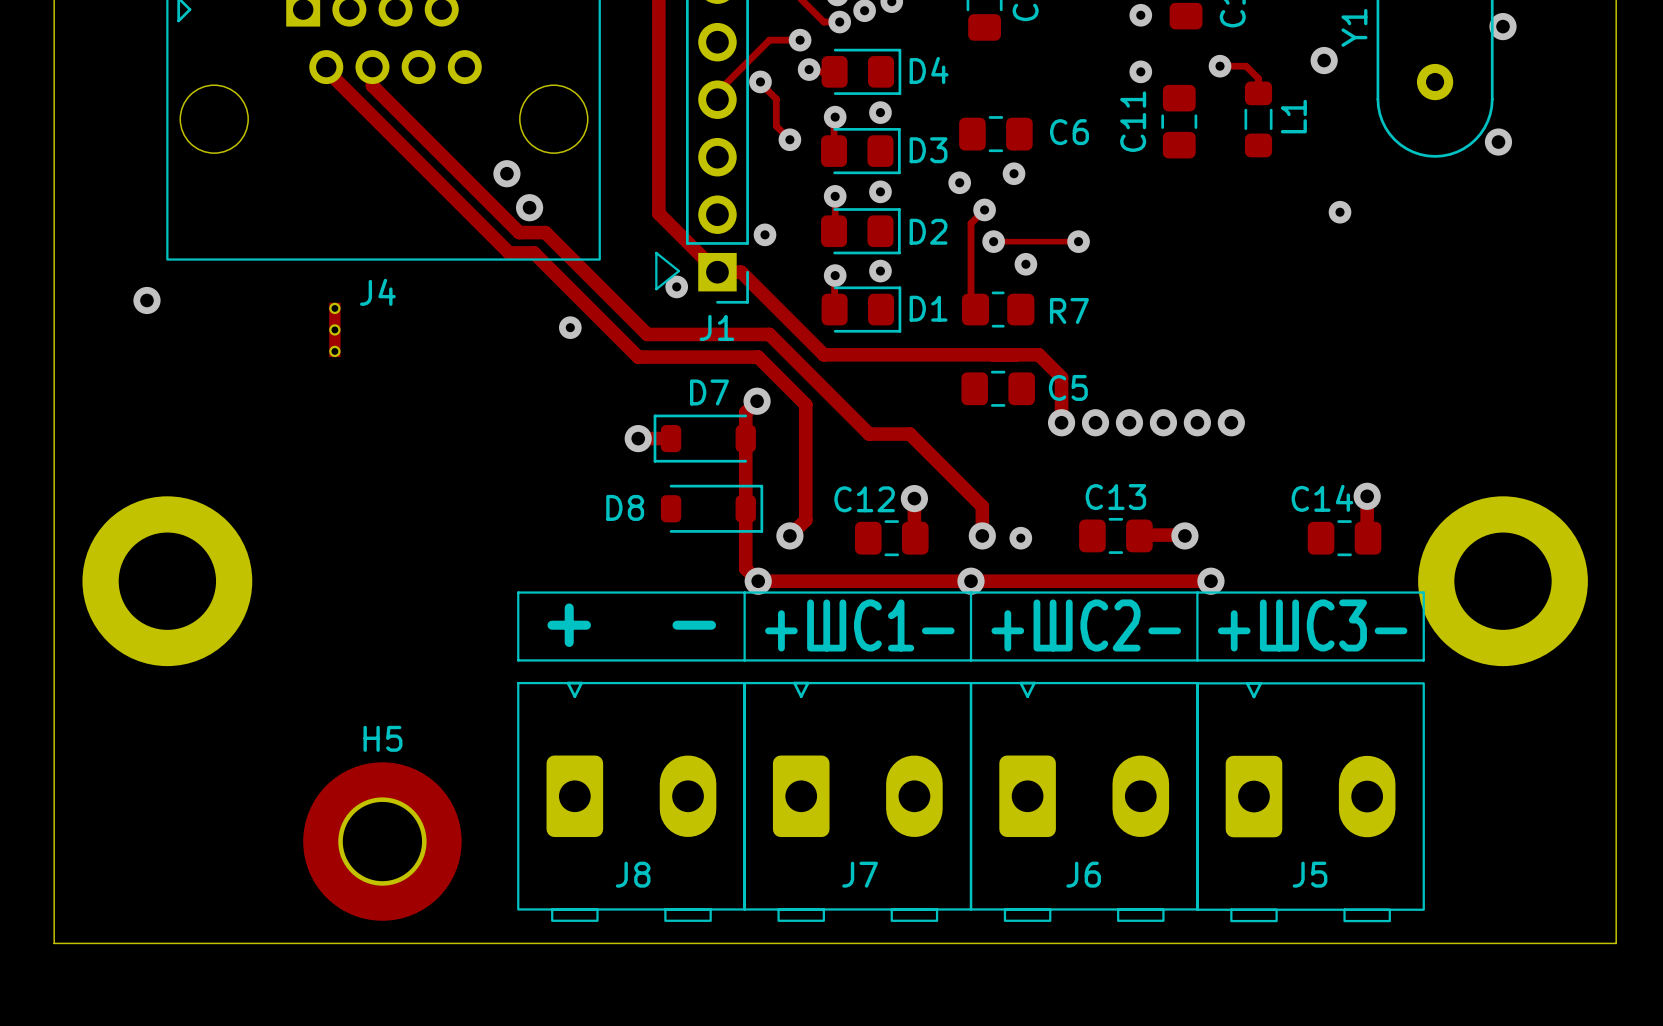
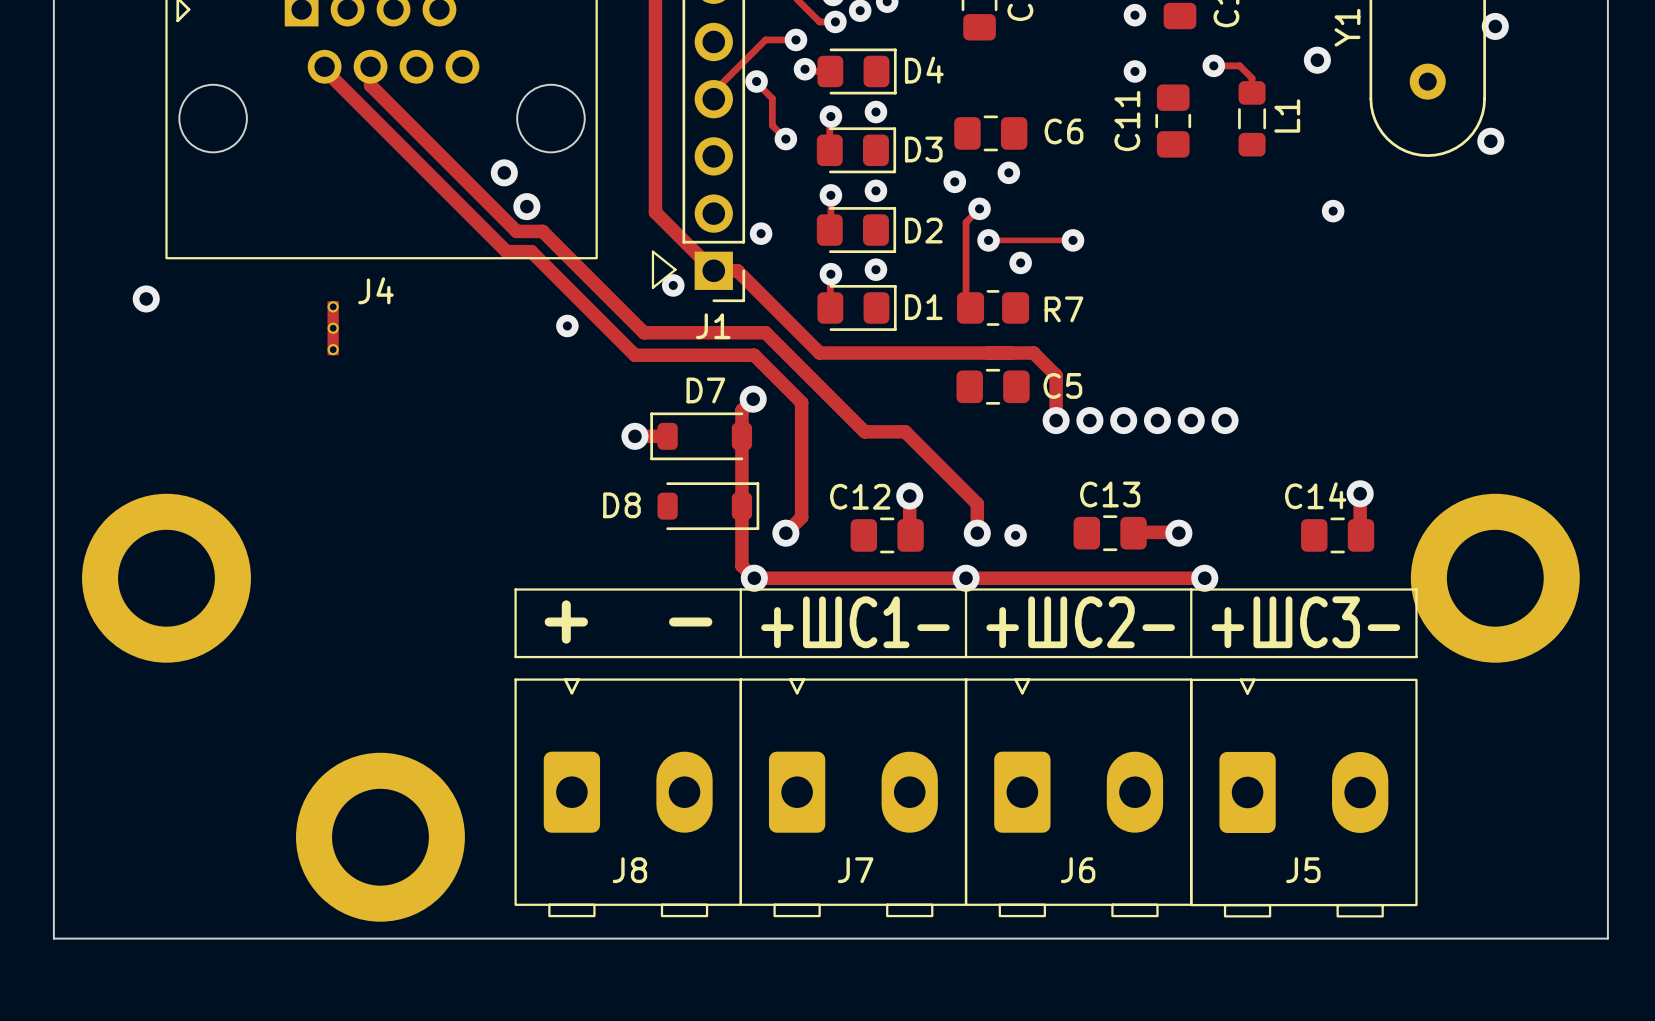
H5: (382, 841) -> none
part: none -> (380, 837)

